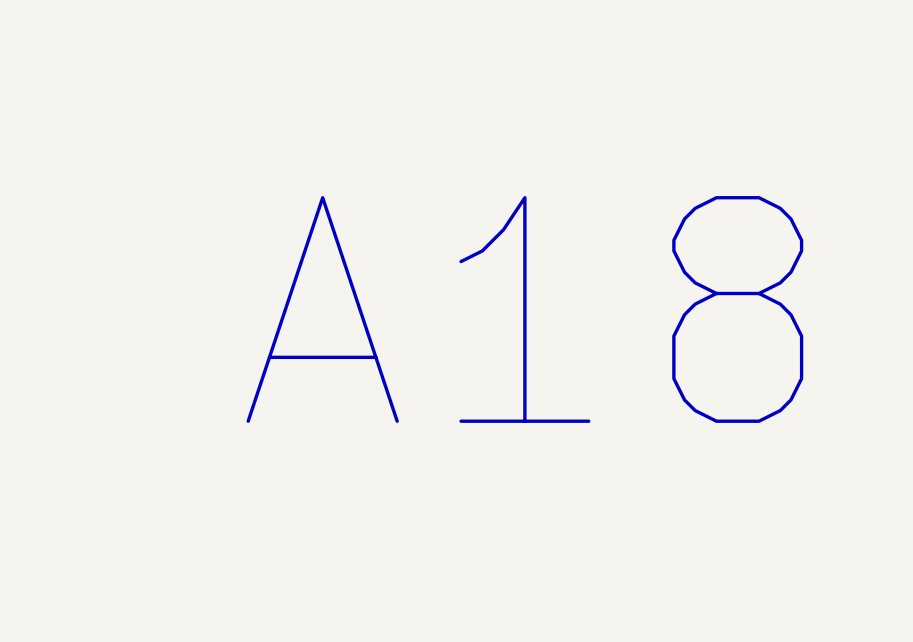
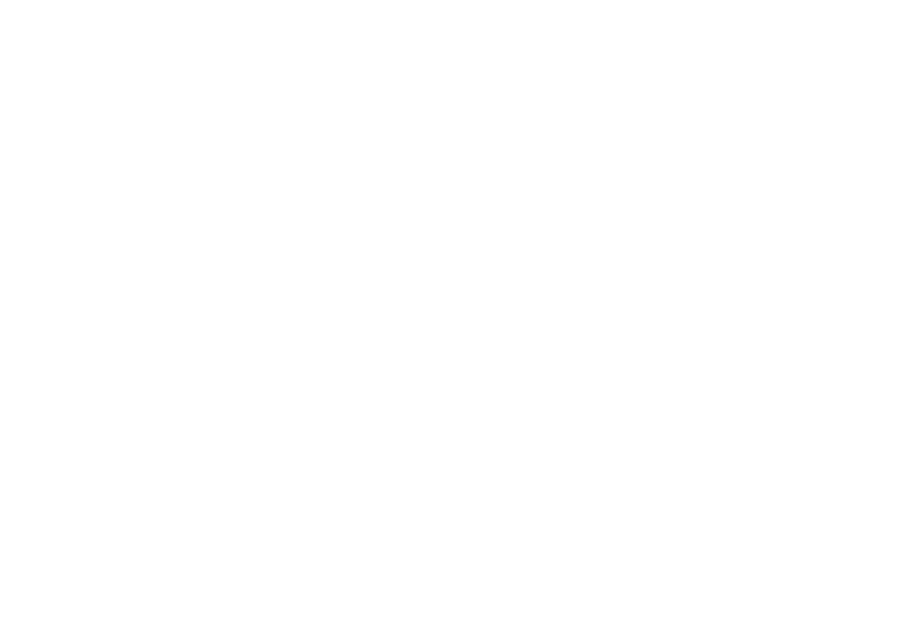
text: A18 (524, 309) -> none

